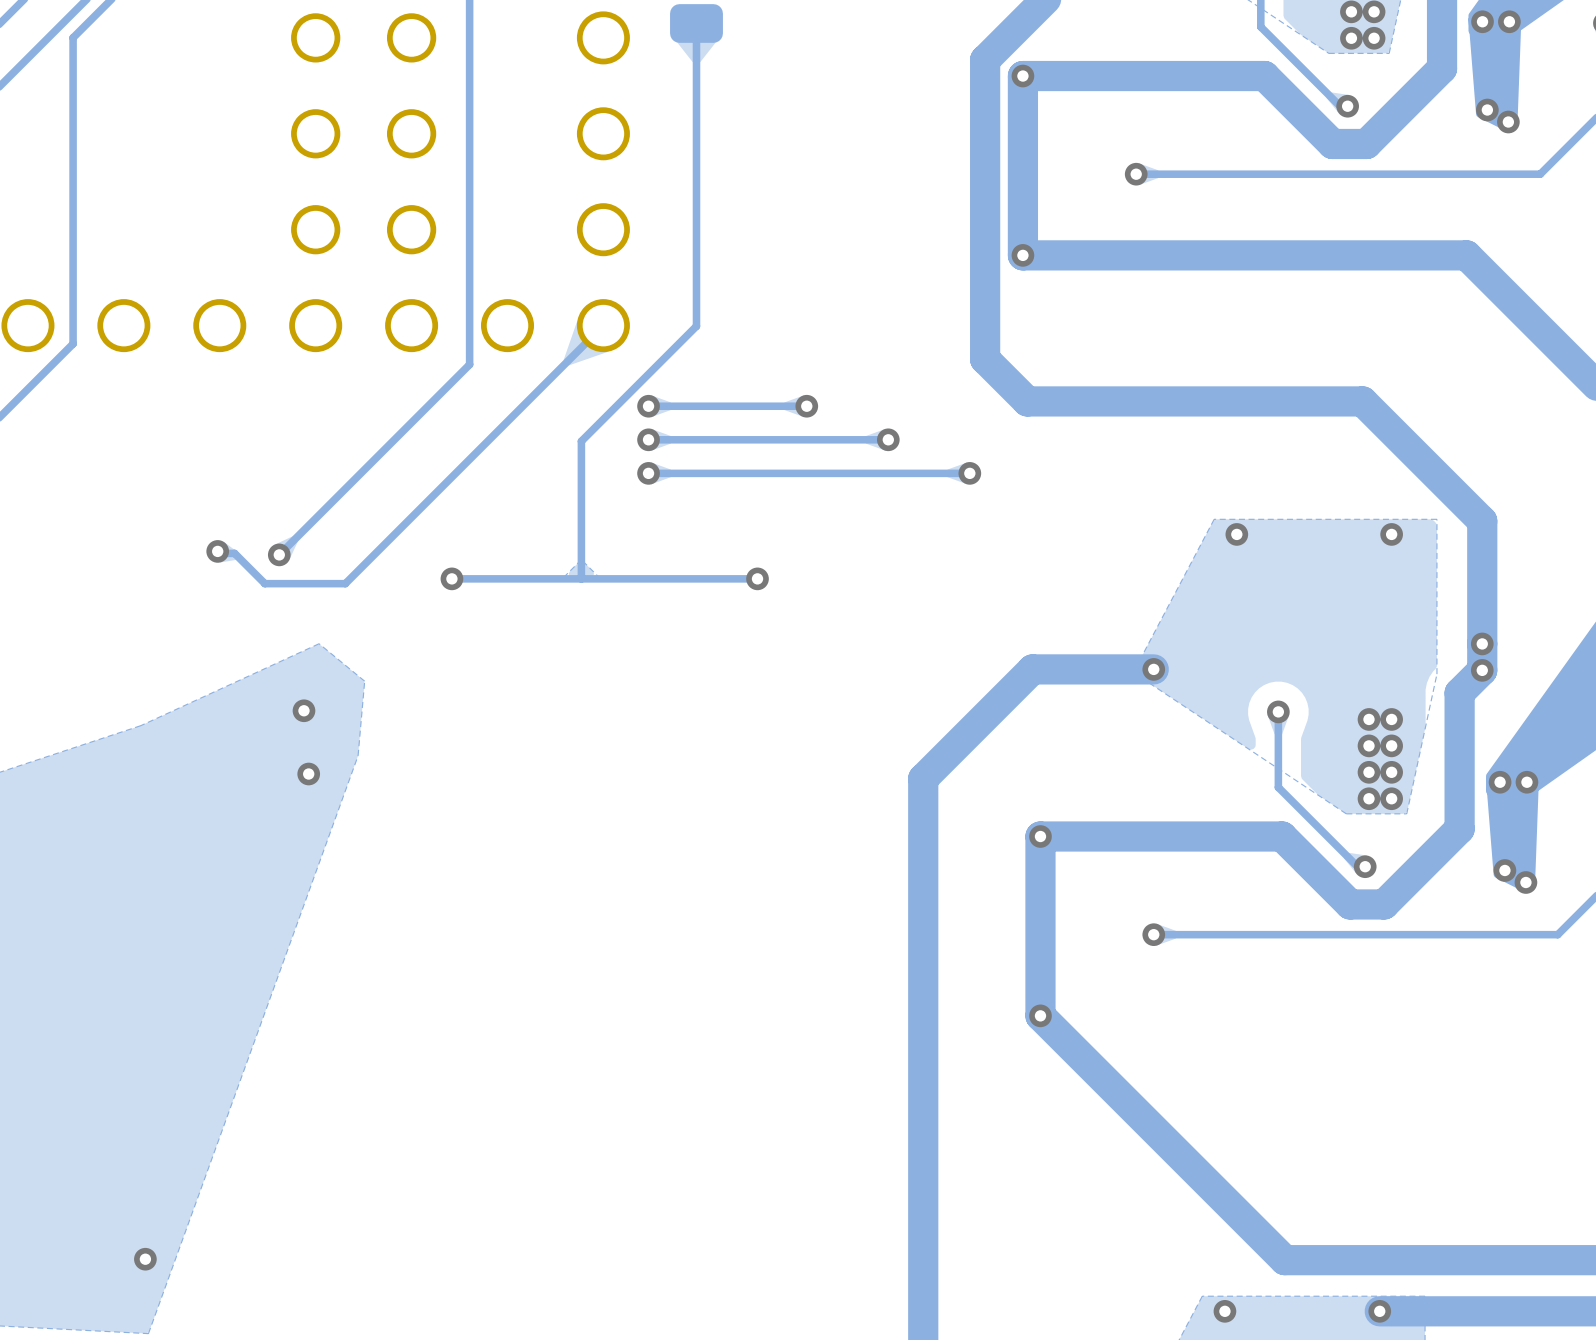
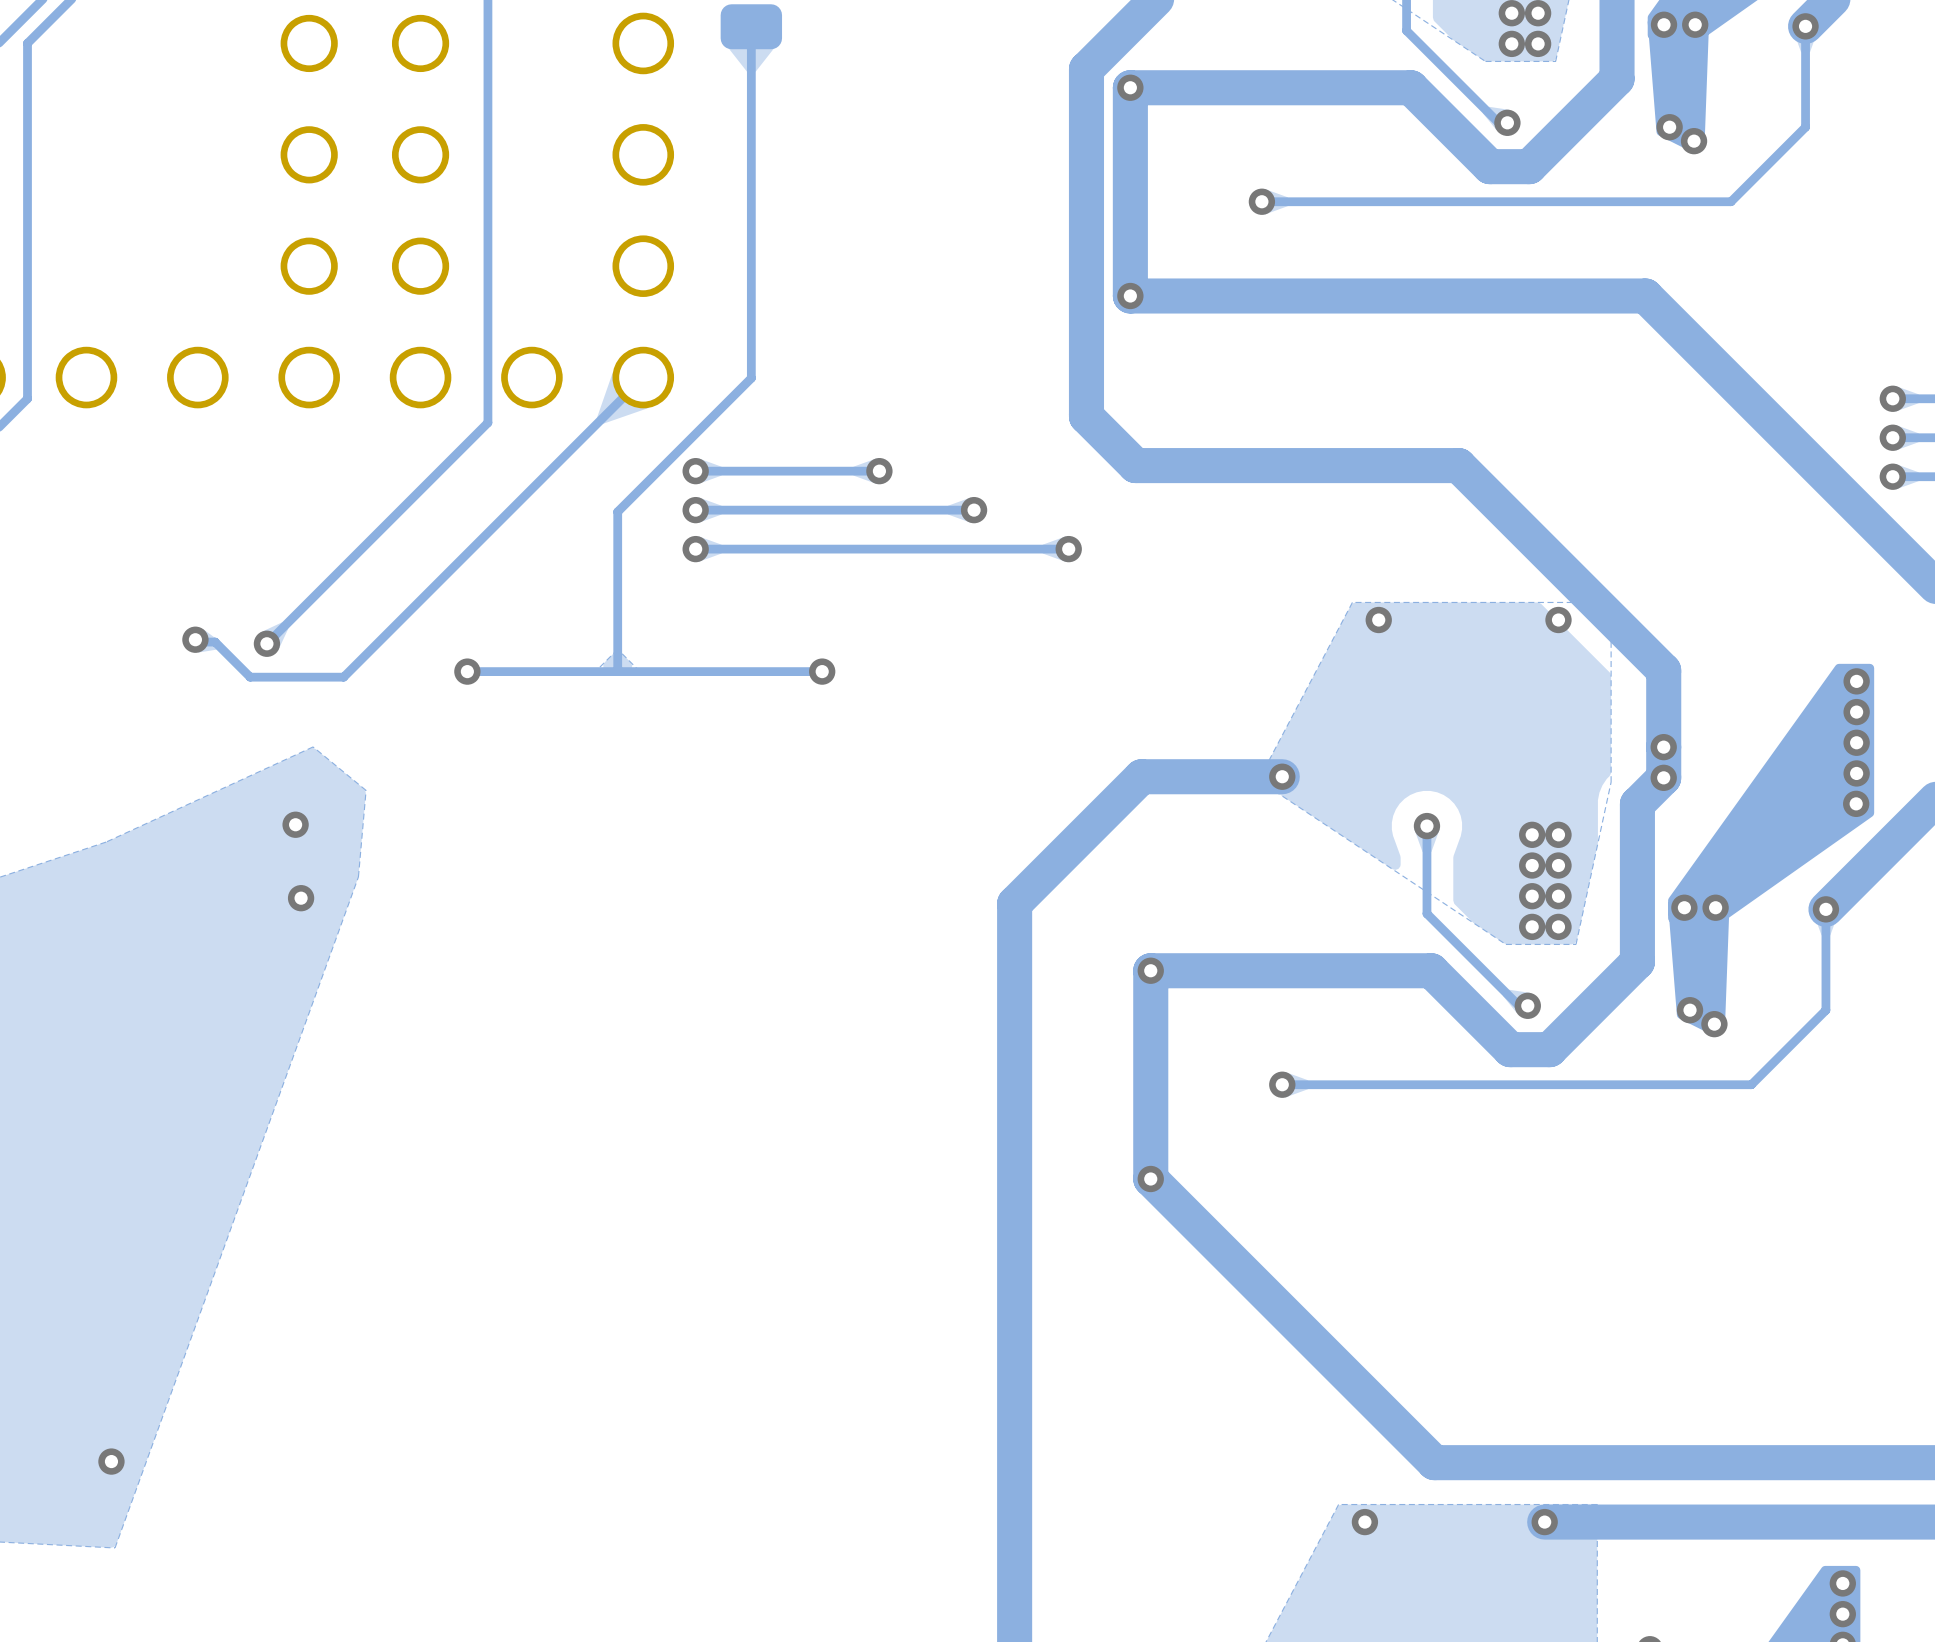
track: (1305, 401) (1362, 401) (1482, 521) (1482, 578) -> (1458, 465) (1663, 670)

